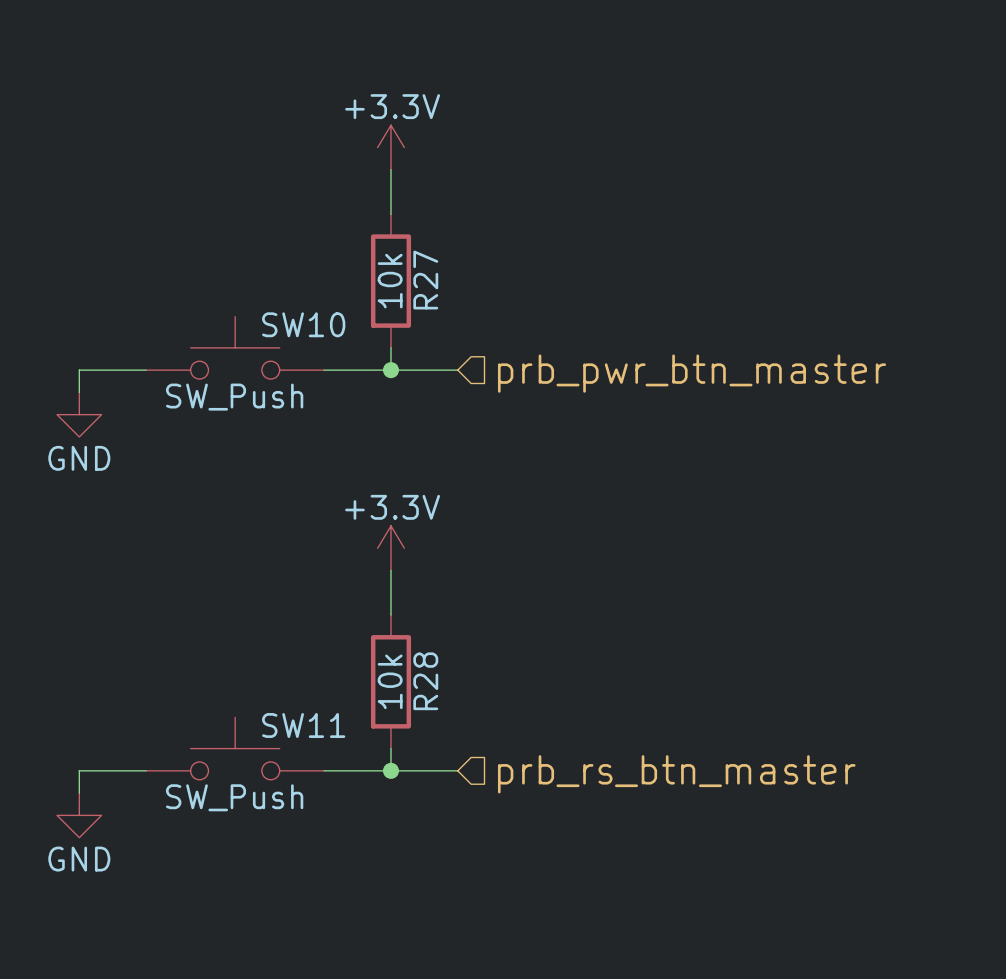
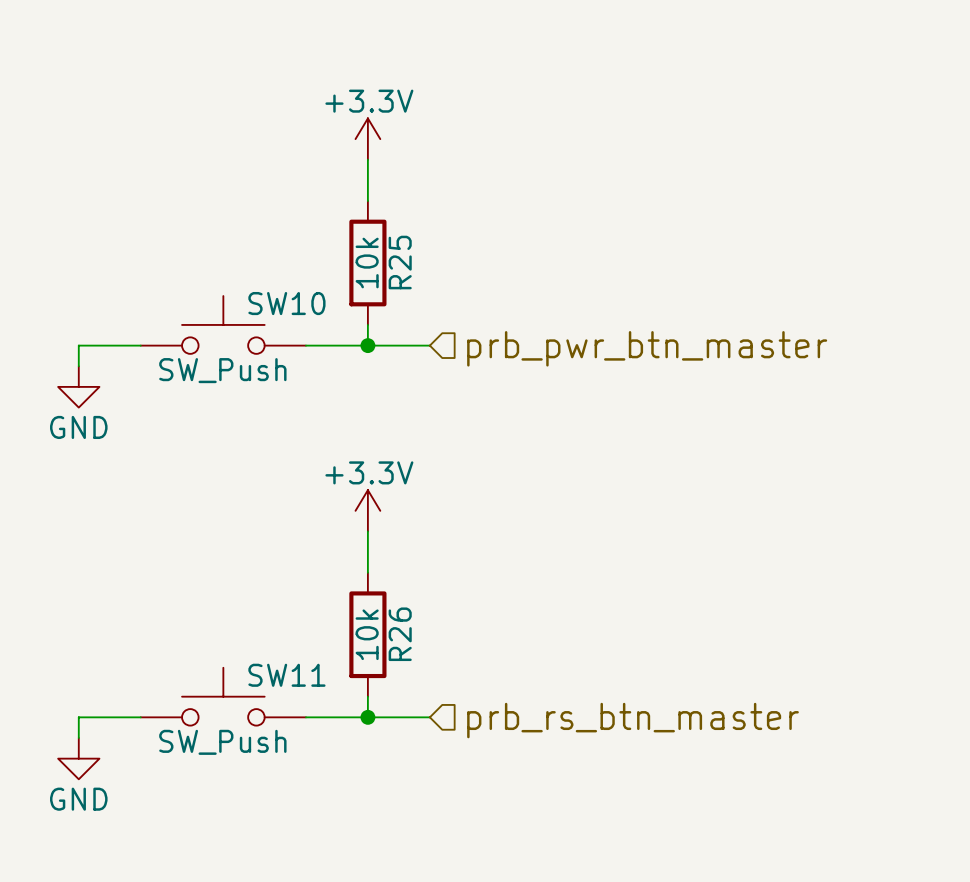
R27 name: R27 (425, 280) -> R25 (400, 262)
R28 name: R28 (425, 681) -> R26 (400, 634)

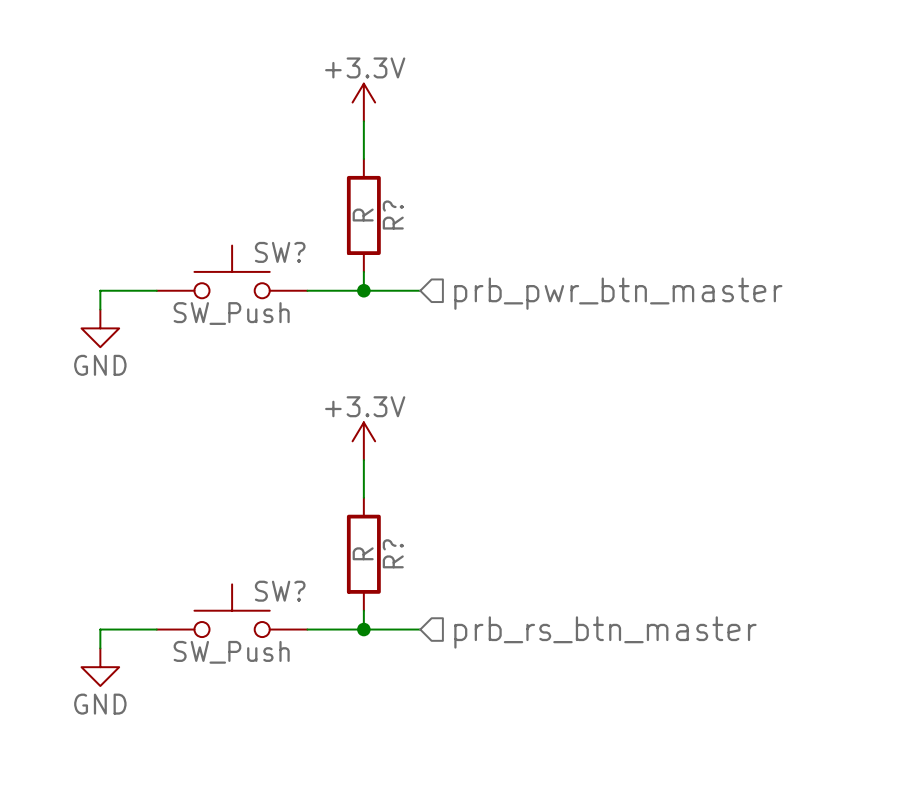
R25 name: R25 (400, 262) -> R? (393, 215)
R25 value: 10k (367, 263) -> R (363, 215)
SW10 name: SW10 (286, 303) -> SW? (280, 252)
R26 value: 10k (367, 634) -> R (363, 553)
R26 name: R26 (400, 634) -> R? (393, 553)
SW11 name: SW11 (286, 675) -> SW? (280, 591)

